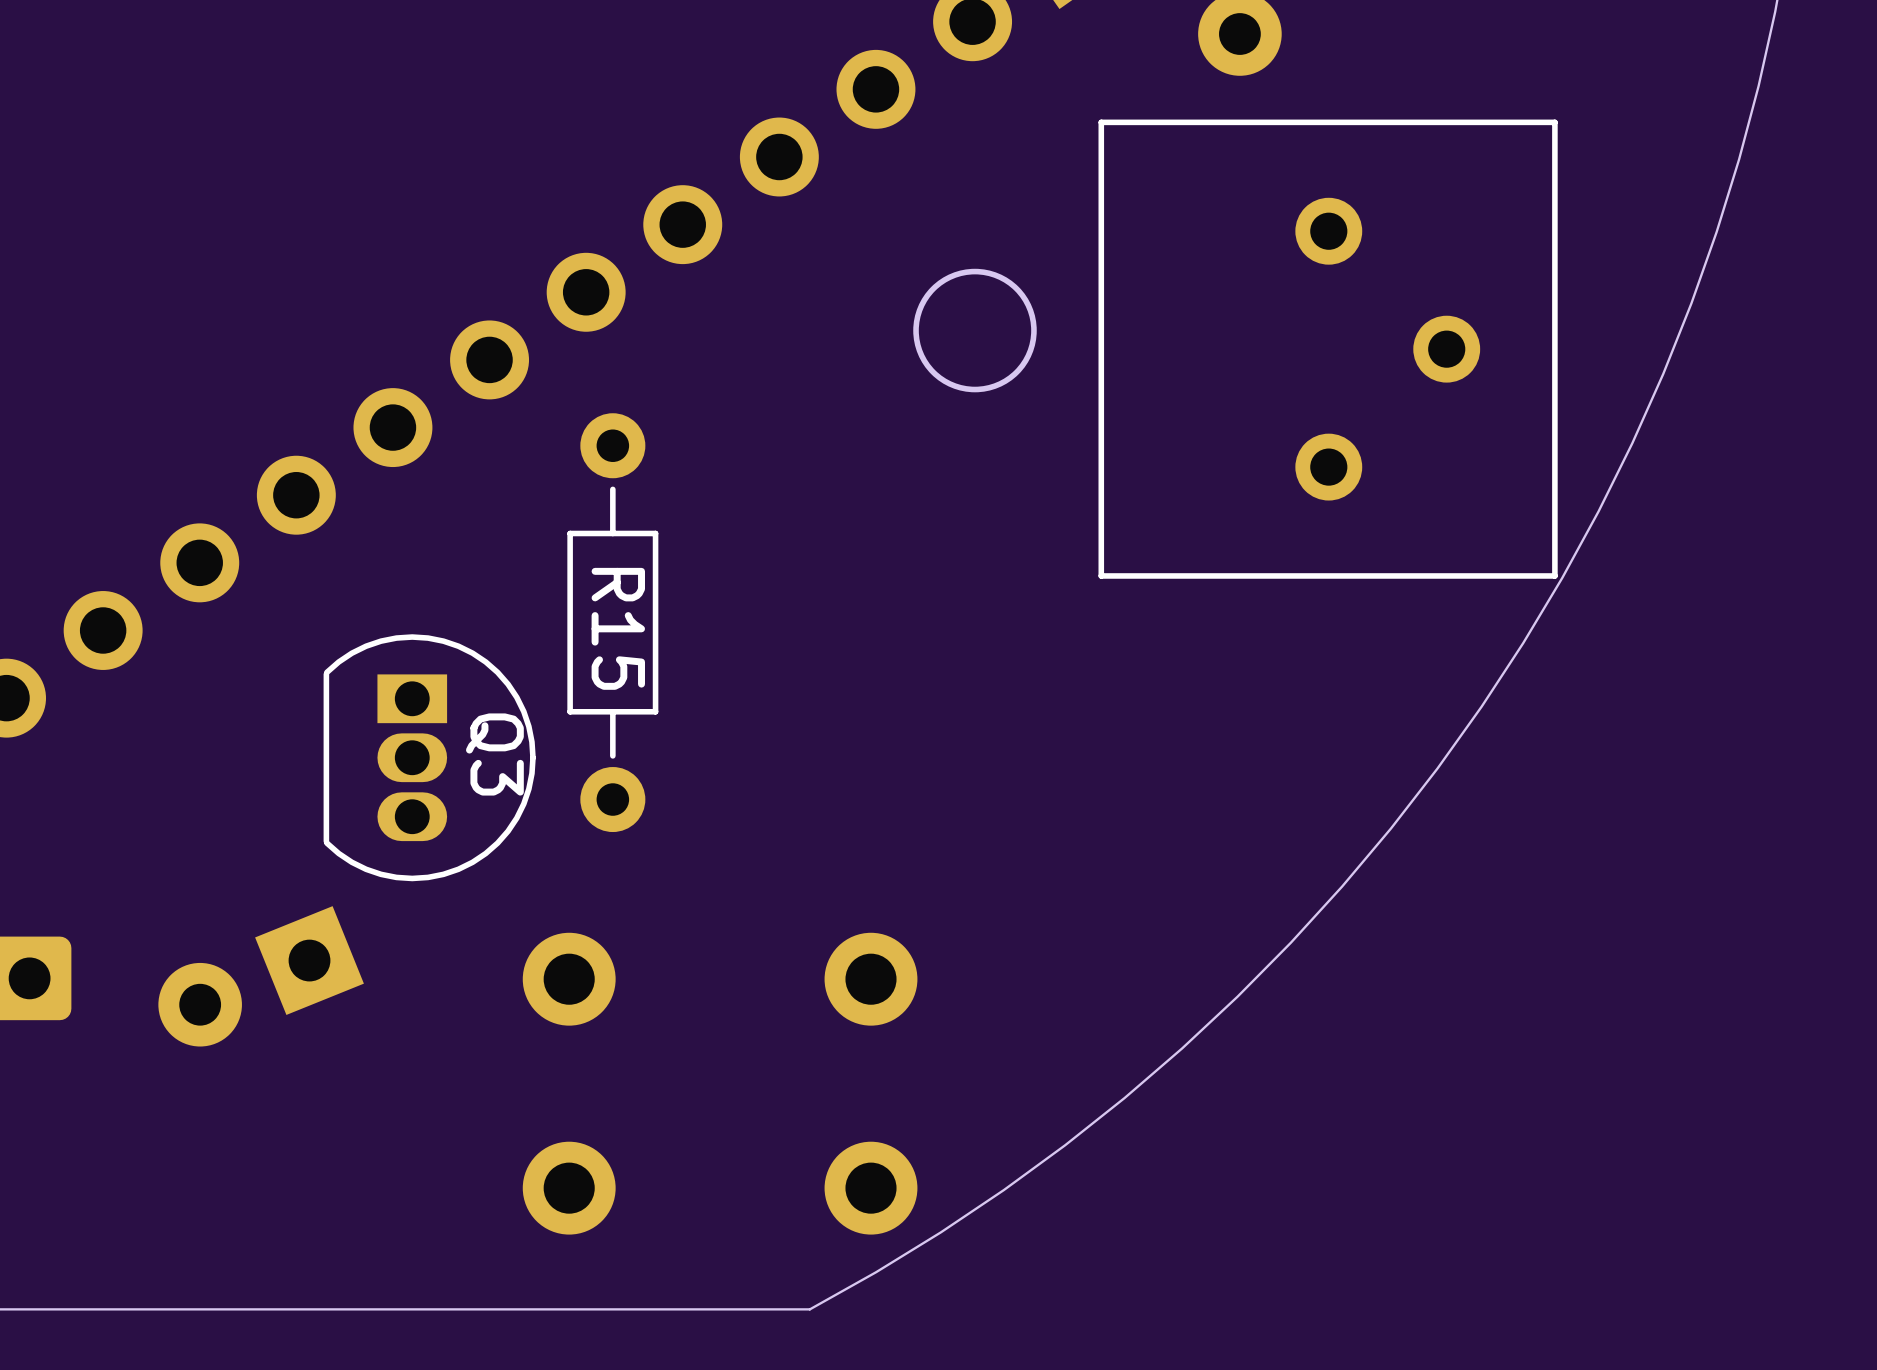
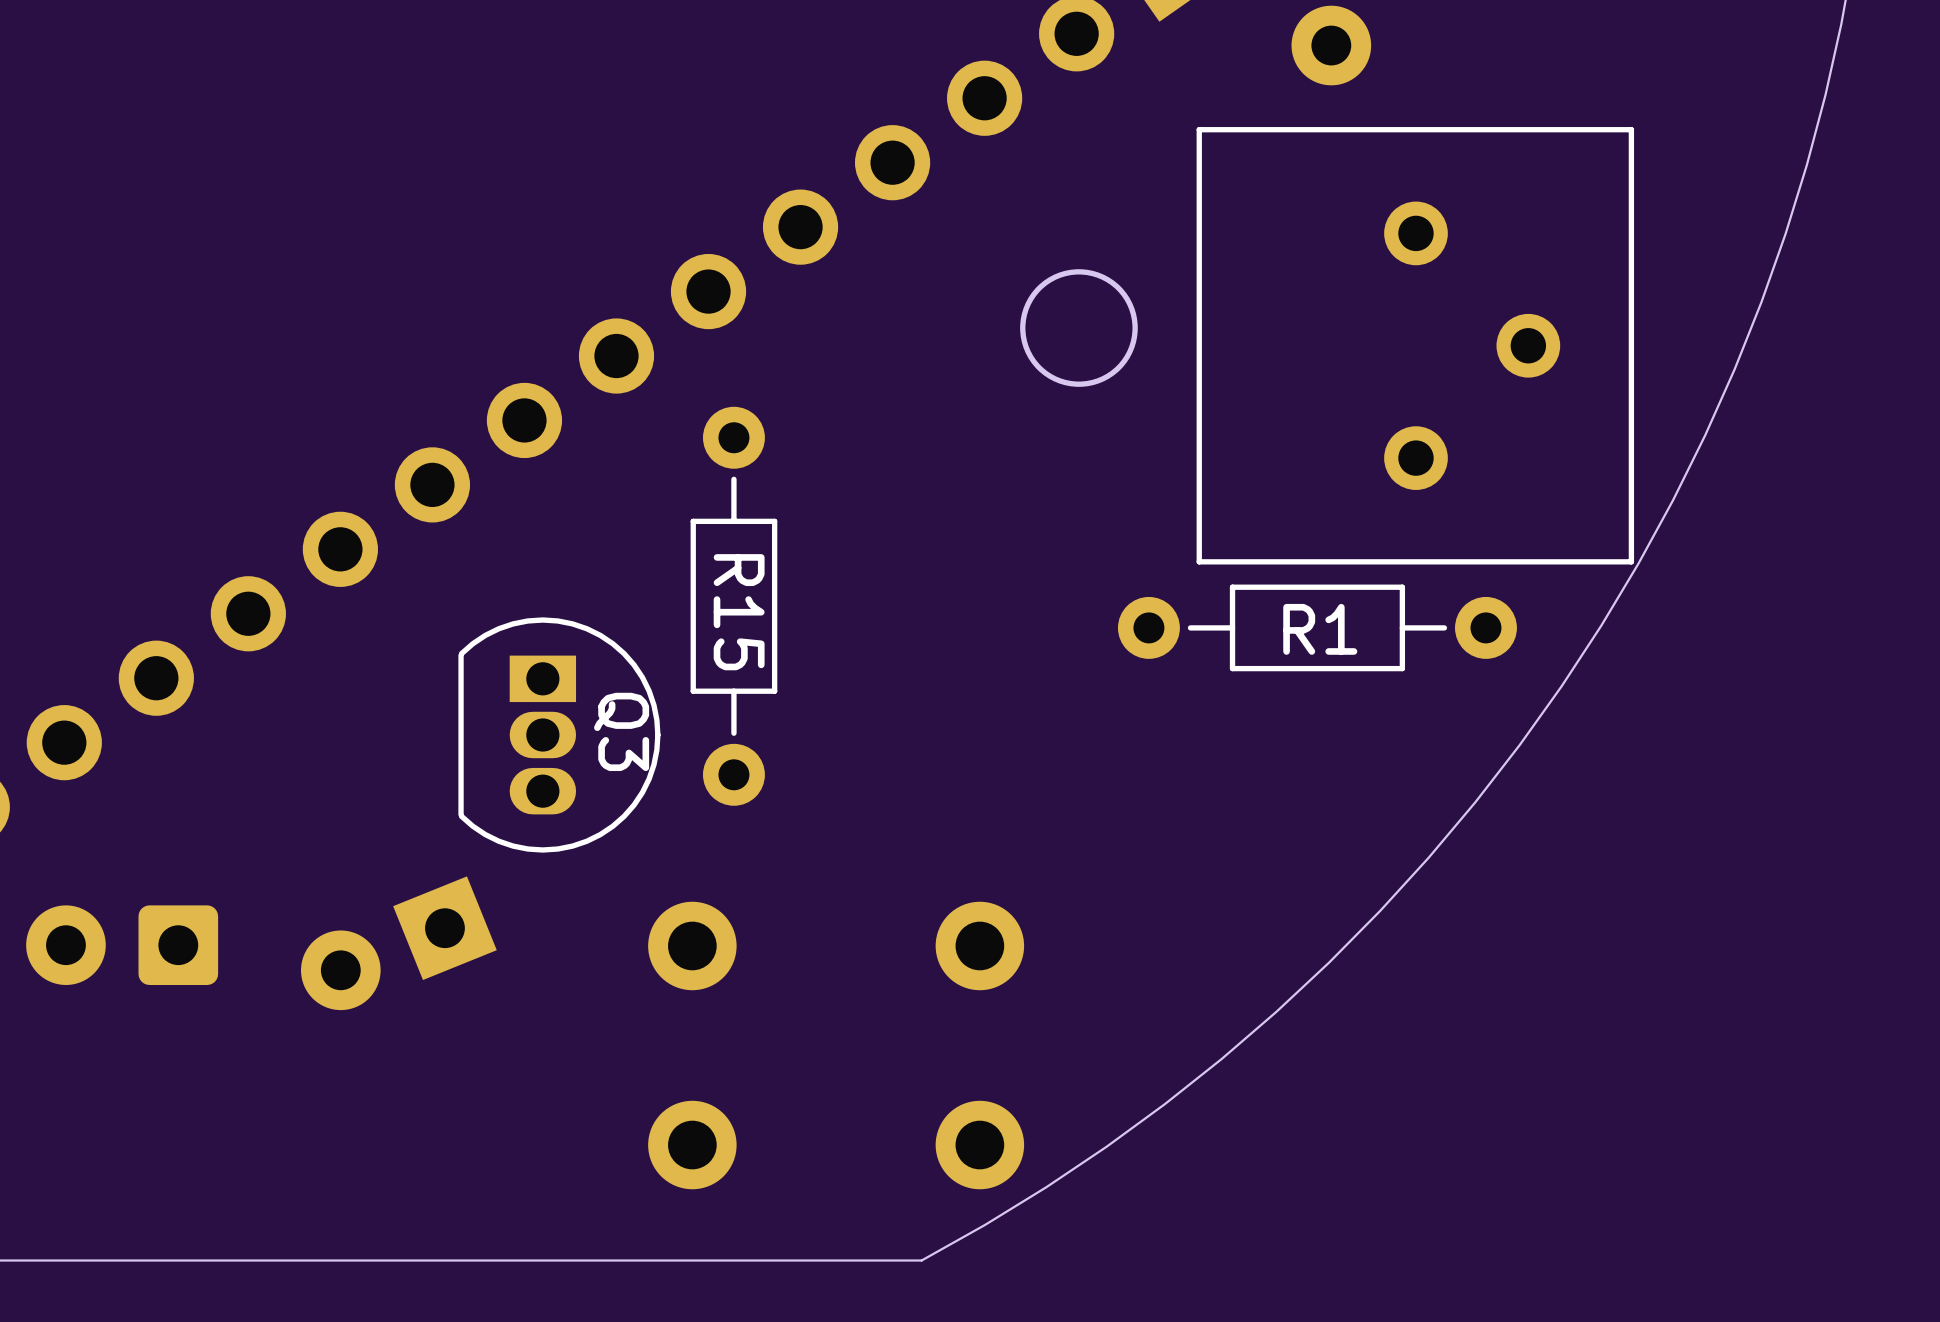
R1: none -> (1317, 627)

